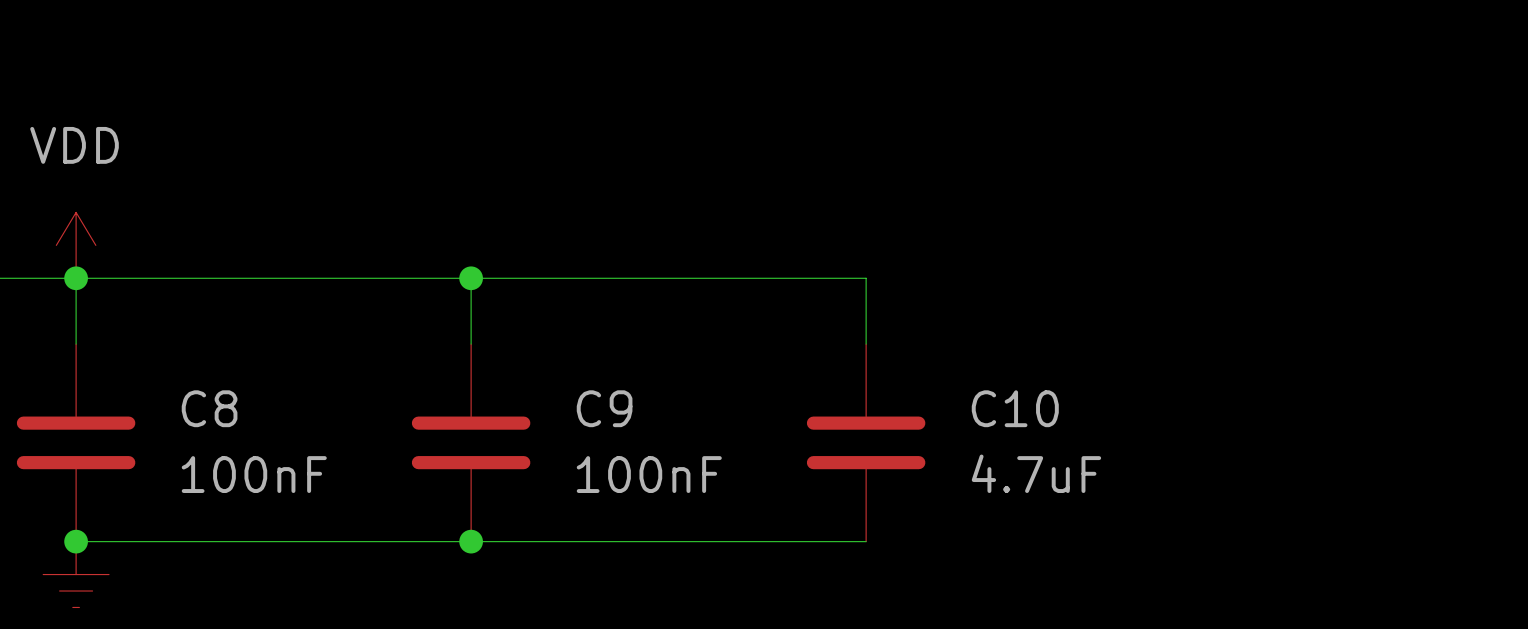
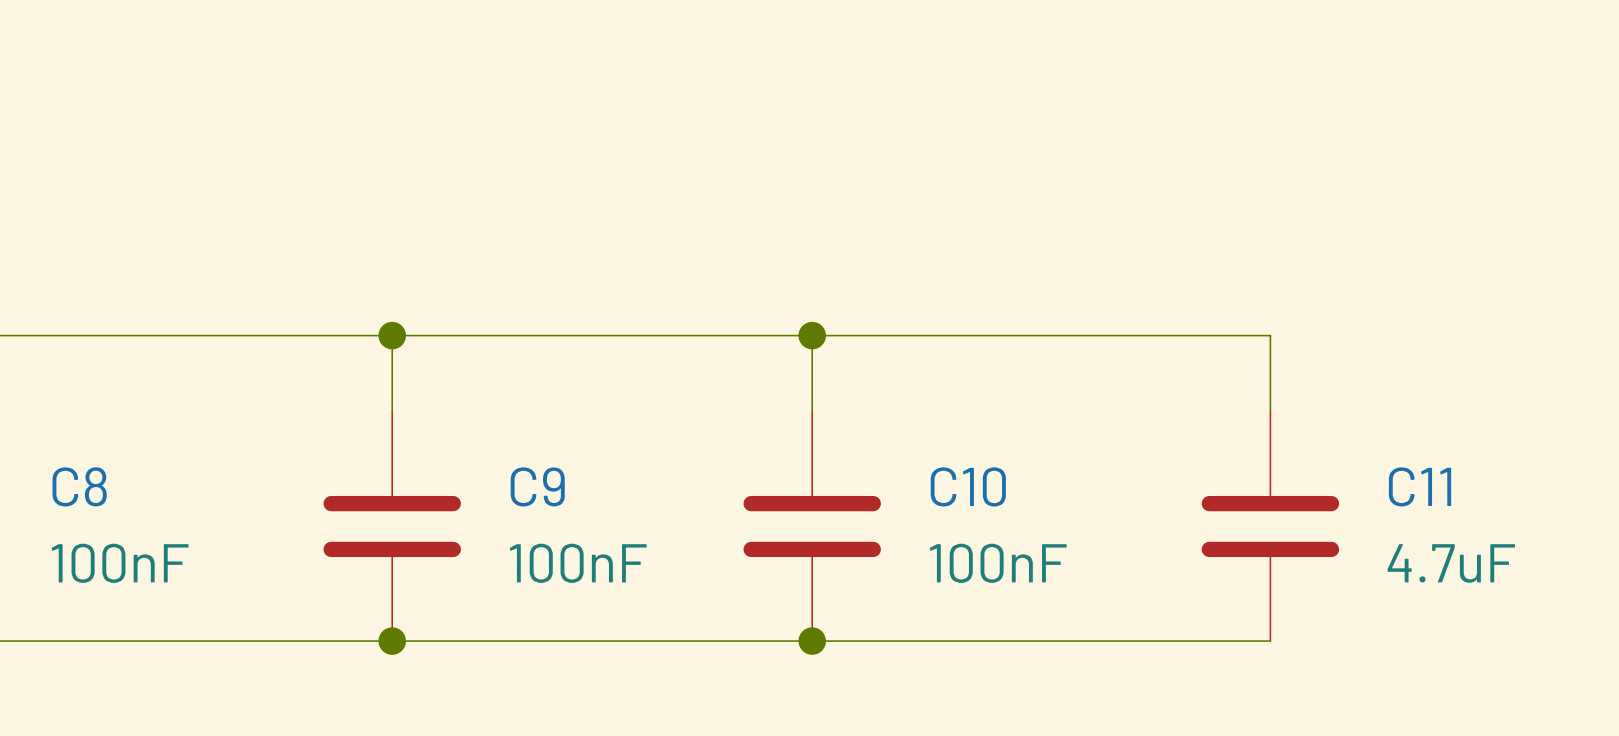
wire: none -> (812, 335) (812, 411)
junction: none -> (812, 335)
wire: (866, 278) (866, 344) -> (850, 335) (1270, 335) (1270, 411)
C10 position: (866, 442) -> (812, 526)
C11: none -> 4.7uF (1270, 526)
C10 value: 4.7uF (1036, 473) -> 100nF (998, 563)
junction: none -> (812, 641)
wire: none -> (850, 641) (1270, 641)

